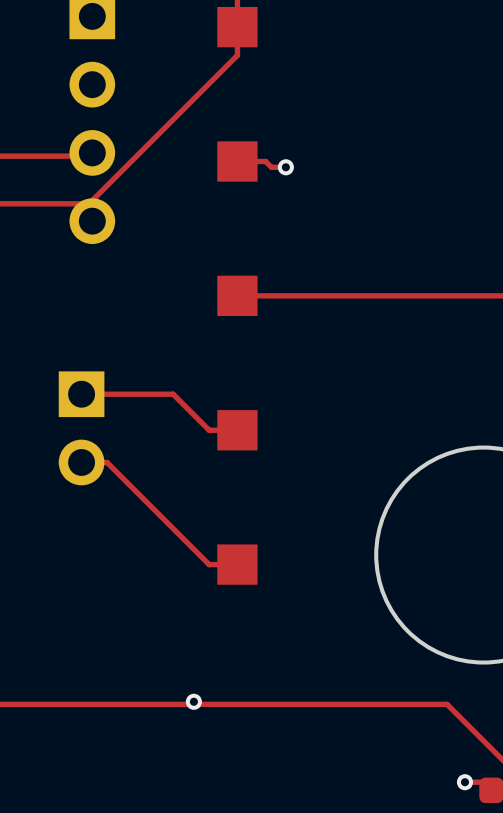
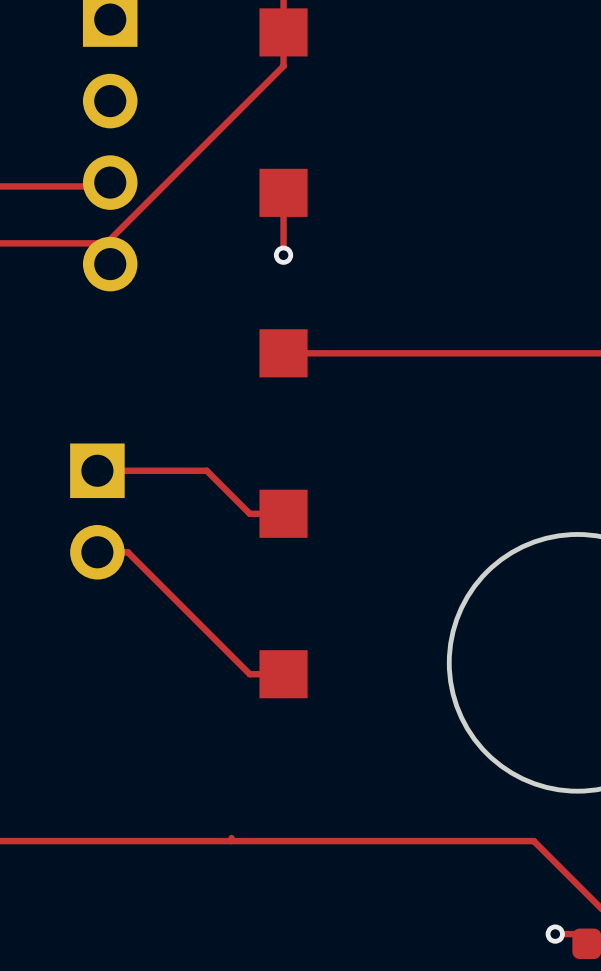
top track: (237, 161) (265, 161) (271, 167) (285, 167) -> (283, 192) (283, 255)
via position: (285, 167) -> (283, 255)
via: (193, 701) -> none

